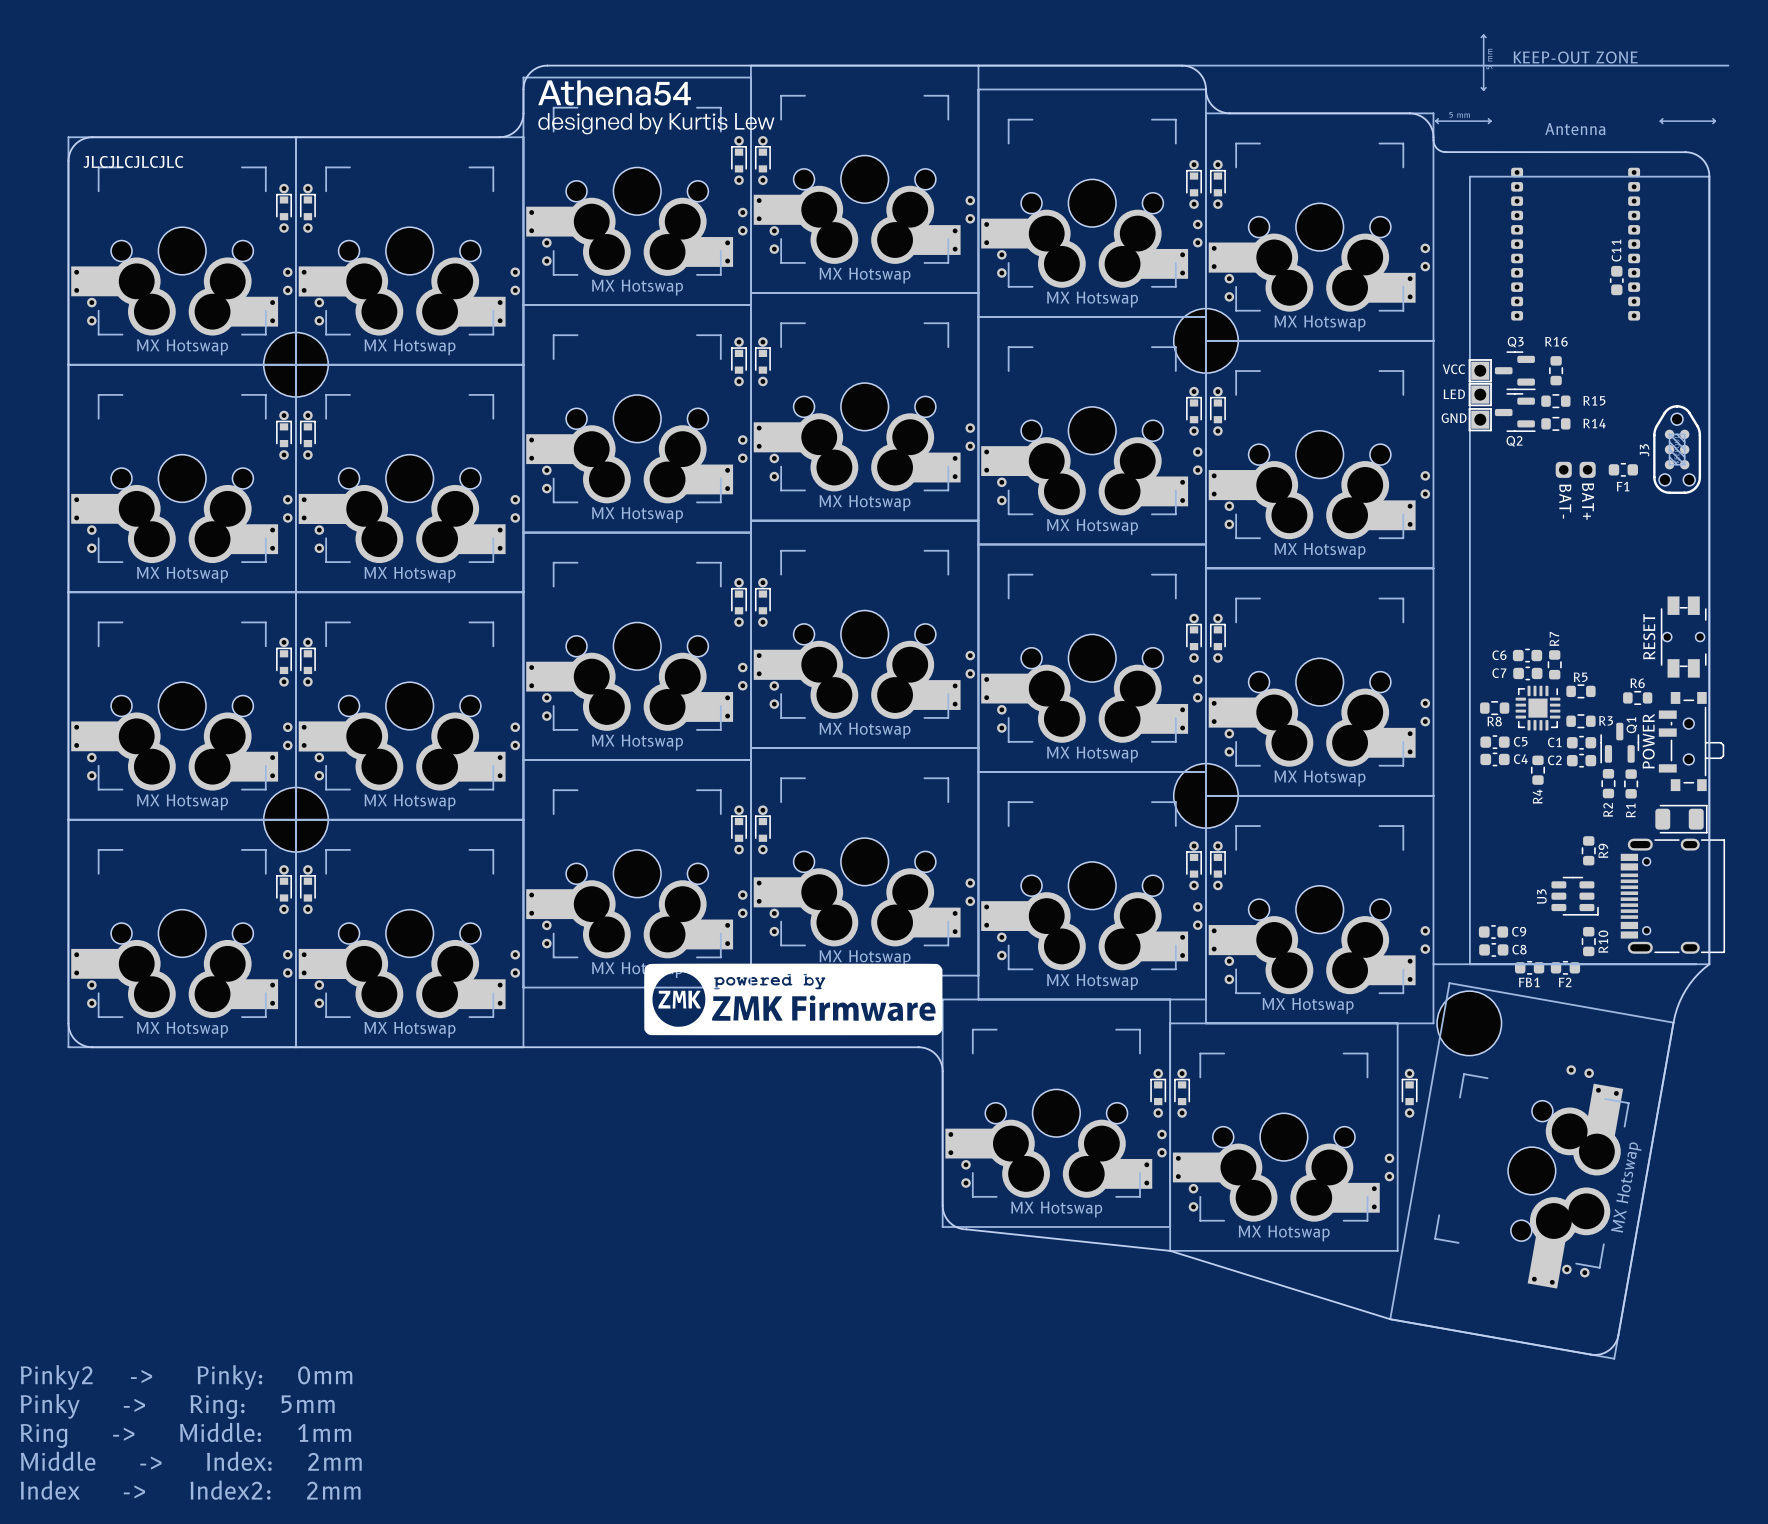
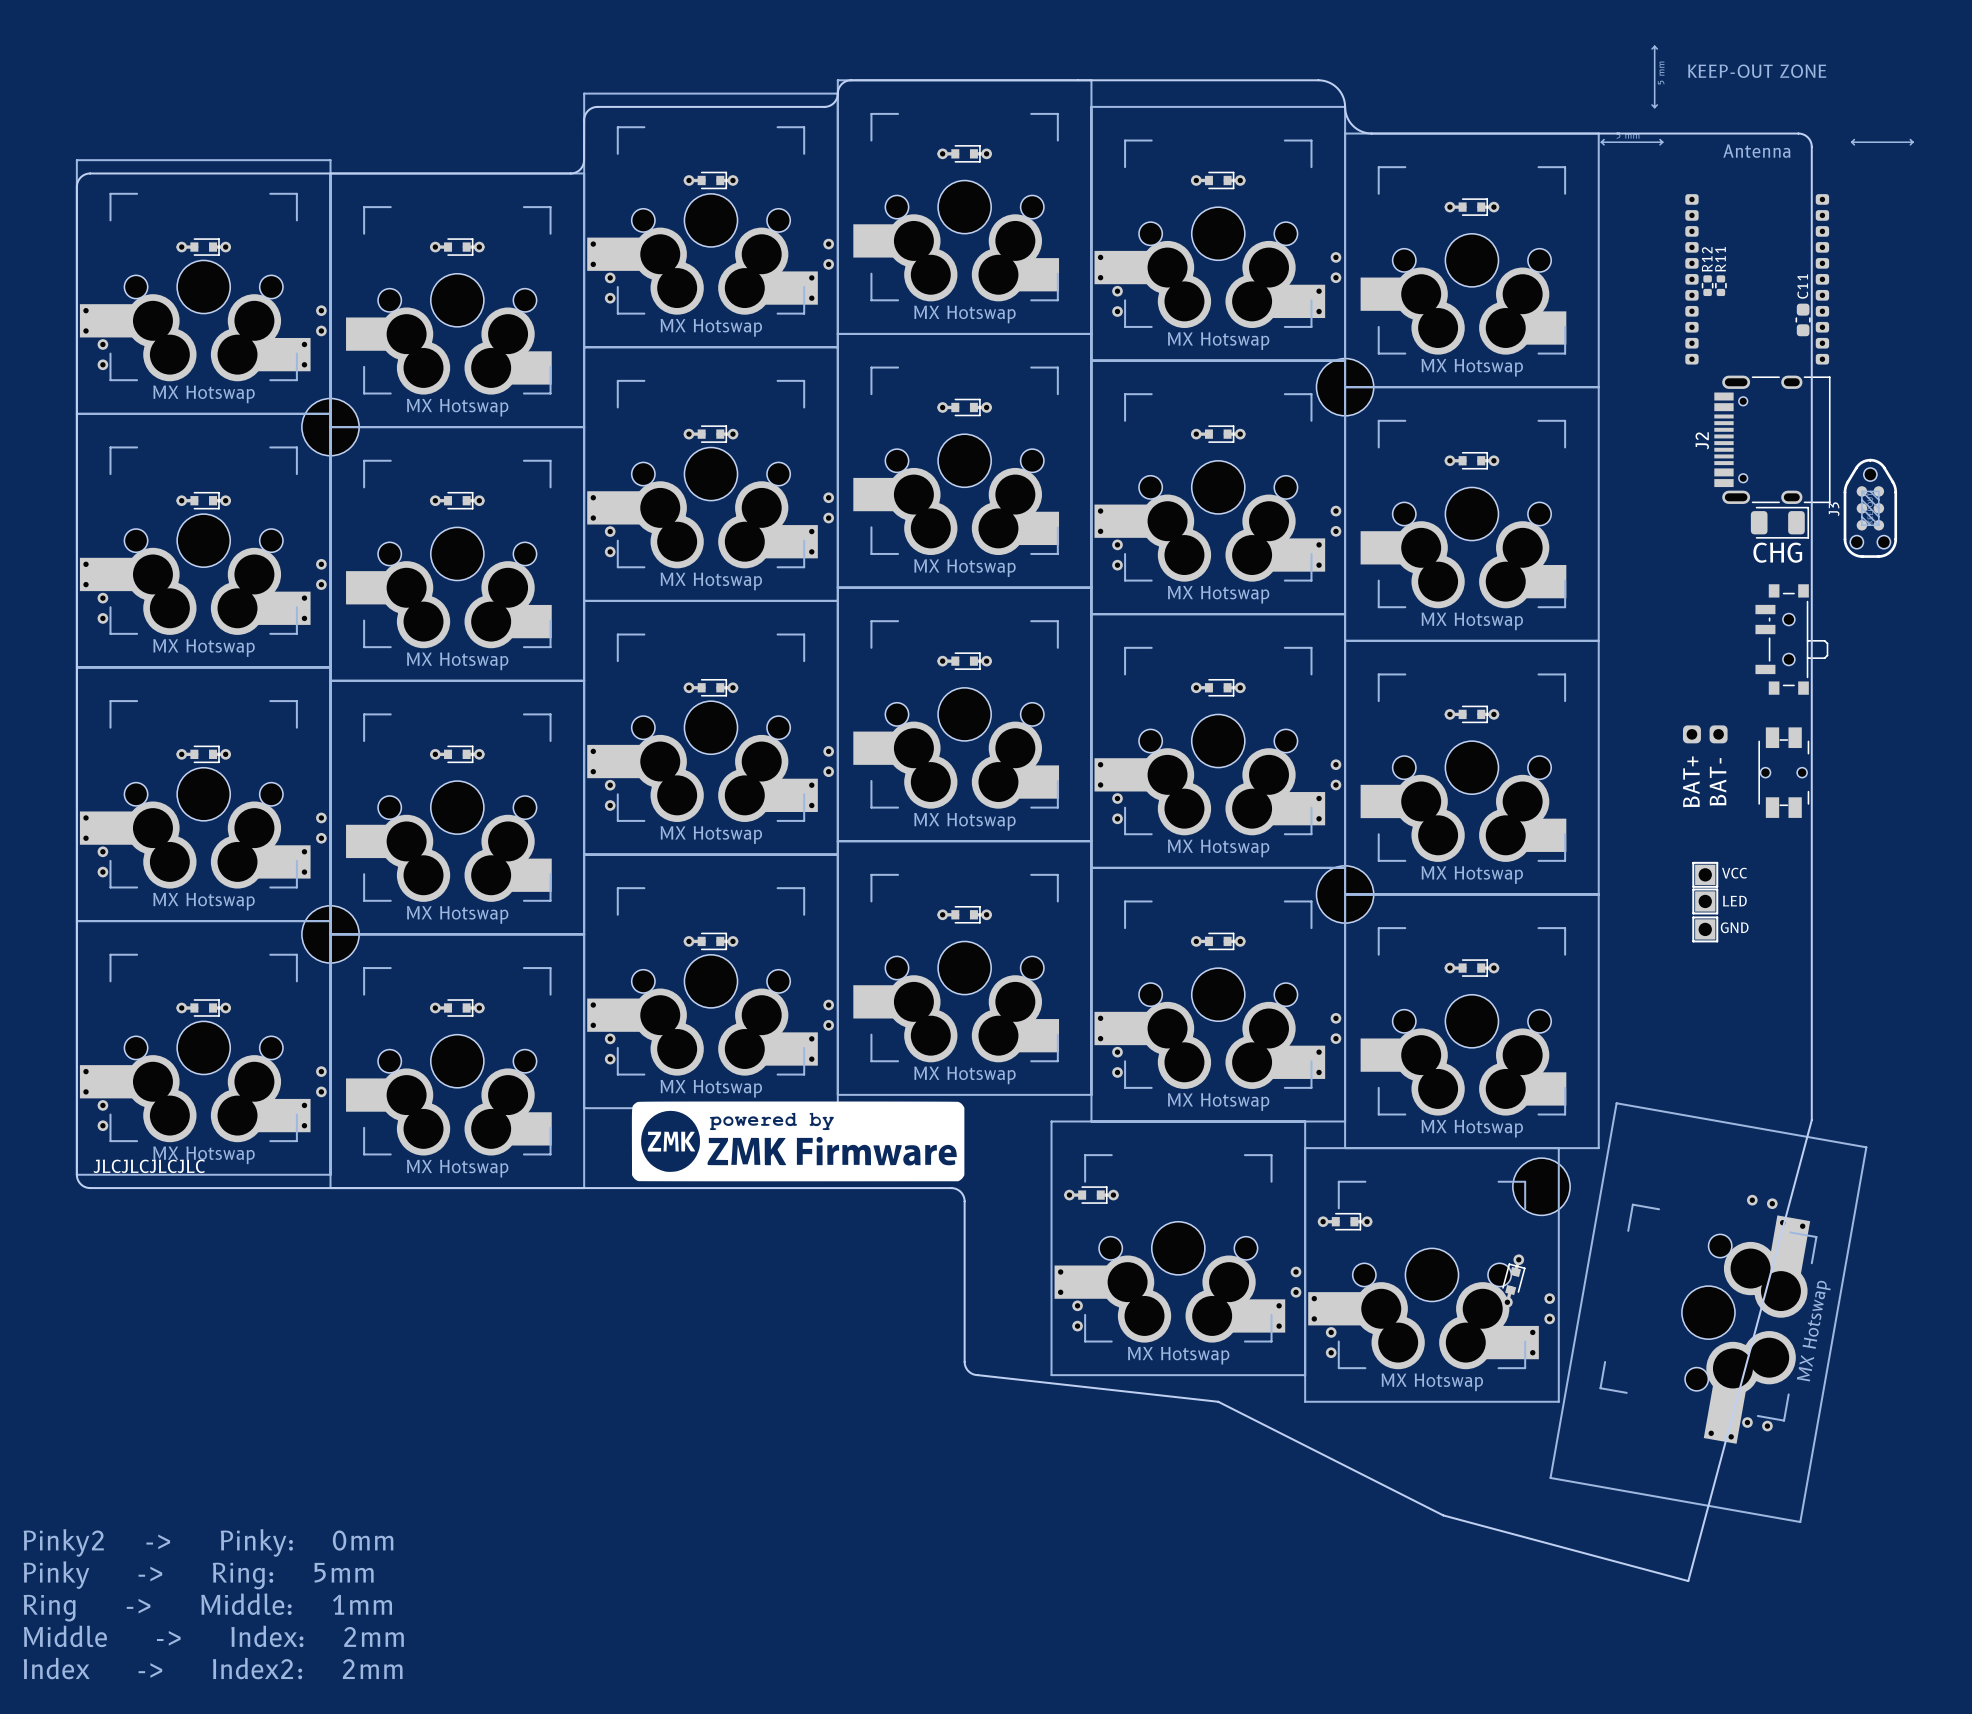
part footprint: [750, 64, 980, 294] -> [836, 79, 1093, 335]
board edge: (762, 65) (542, 66) (532, 70) (524, 81) (523, 116) (520, 125) (514, 132) (502, 137) (92, 137) (81, 139) (75, 144) (69, 153) (68, 161) -> (851, 80) (841, 84) (835, 100) (825, 106) (593, 107) (588, 110) (584, 117) (583, 164) (579, 170) (572, 173) (90, 173) (80, 177) (76, 186)
line: (978, 65) (1728, 65) -> none
drawing: [538, 80, 775, 135] -> none
part footprint: [1205, 112, 1435, 342] -> [1344, 132, 1600, 389]
board edge: (1409, 113) (1419, 115) (1428, 122) (1432, 131) (1434, 145) (1442, 151) (1688, 152) (1702, 159) (1709, 173) (1709, 964) (1694, 978) (1685, 990) (1674, 1015) (1618, 1335) (1615, 1343) (1608, 1350) (1600, 1354) (1590, 1354) (1390, 1319) (1170, 1250) (956, 1227) (947, 1220) (942, 1208) (942, 1065) (935, 1054) (924, 1047) (92, 1047) (81, 1044) (75, 1040) (69, 1031) (68, 1023) -> (1572, 133) (1798, 133) (1806, 136) (1811, 145) (1811, 1120) (1688, 1581) (1443, 1515) (1218, 1401) (972, 1373) (966, 1368) (964, 1361) (964, 1199) (960, 1191) (954, 1188) (90, 1188) (83, 1186) (77, 1179) (76, 1148)
part: none -> (964, 153)
part footprint: [295, 136, 525, 366] -> [329, 172, 586, 429]
part: none -> (710, 180)
part: none -> (1218, 180)
part: (739, 160) -> none
part: (762, 160) -> none
text: JLCJLCJLCJLC (133, 161) -> none
part: none -> (1471, 207)
part: (1194, 184) -> none
part: (1217, 184) -> none
part: (284, 208) -> none
part: (307, 208) -> none
part: none -> (203, 247)
part: none -> (457, 247)
R12: none -> (1707, 285)
R11: none -> (1720, 285)
part footprint: [750, 292, 980, 522] -> [836, 332, 1093, 589]
part footprint: [1173, 308, 1239, 374] -> [1316, 358, 1374, 416]
part footprint: [263, 332, 329, 398] -> [301, 398, 360, 456]
part footprint: [1205, 339, 1435, 570] -> [1344, 386, 1600, 642]
part: none -> (964, 407)
part: (739, 361) -> none
part: (762, 361) -> none
part footprint: [295, 363, 525, 594] -> [329, 426, 586, 682]
Q3: (1515, 370) -> none
R16: (1556, 370) -> none
part: none -> (710, 434)
part: none -> (1218, 434)
J2: none -> (1772, 439)
part: (1480, 395) -> none
R15: (1555, 401) -> none
part: none -> (1471, 460)
part: (1194, 411) -> none
part: (1217, 411) -> none
Q2: (1515, 412) -> none
R14: (1555, 423) -> none
part: (284, 435) -> none
part: (307, 435) -> none
part: none -> (203, 500)
part: none -> (457, 500)
part: none -> CHG (1779, 522)
part side: top (1575, 469) -> bottom (1705, 734)
F1: (1623, 469) -> none
part footprint: [750, 519, 980, 750] -> [836, 586, 1093, 843]
part footprint: [1205, 567, 1435, 797] -> [1344, 639, 1600, 896]
part: none -> (1791, 639)
part: none -> (964, 661)
part footprint: [295, 591, 525, 821] -> [329, 679, 586, 936]
part: (739, 602) -> none
part: (762, 602) -> none
part: none -> (710, 687)
part: none -> (1218, 687)
part: none -> (1471, 714)
part: RESET (1683, 637) -> none
part: (1194, 638) -> none
part: (1217, 638) -> none
C6: (1527, 655) -> none
part: (284, 662) -> none
part: (307, 662) -> none
R7: (1554, 664) -> none
part: none -> (203, 754)
part: none -> (457, 754)
C7: (1527, 673) -> none
part: none -> (1783, 772)
R5: (1580, 691) -> none
R6: (1637, 697) -> none
R8: (1494, 708) -> none
part: (1537, 708) -> none
R3: (1580, 721) -> none
part: POWER (1691, 741) -> none
C5: (1494, 742) -> none
C1: (1581, 742) -> none
Q1: (1619, 743) -> none
part footprint: [750, 747, 980, 977] -> [836, 840, 1093, 1096]
C4: (1494, 759) -> none
C2: (1581, 760) -> none
part footprint: [1173, 763, 1239, 829] -> [1316, 865, 1374, 924]
R4: (1537, 770) -> none
R2: (1608, 783) -> none
R1: (1631, 783) -> none
part footprint: [263, 787, 329, 853] -> [301, 905, 360, 964]
part footprint: [1205, 794, 1435, 1025] -> [1344, 893, 1600, 1150]
part: none -> (1705, 902)
part: none -> (964, 914)
part footprint: [295, 818, 525, 1049] -> [329, 933, 586, 1190]
part: (1681, 819) -> none
part: (739, 829) -> none
part: (762, 829) -> none
part: none -> (710, 941)
part: none -> (1218, 941)
R9: (1588, 850) -> none
part: none -> (1471, 968)
part: (1194, 865) -> none
part: (1217, 865) -> none
part: (284, 889) -> none
part: (307, 889) -> none
U3: (1575, 896) -> none
part: (1672, 896) -> none
part: none -> (203, 1007)
part: none -> (457, 1007)
C9: (1493, 932) -> none
R10: (1588, 941) -> none
C8: (1493, 949) -> none
line: (1433, 964) (1709, 964) (1709, 176) (1469, 176) (1469, 964) -> none
FB1: (1529, 967) -> none
F2: (1565, 967) -> none
drawing position: (793, 999) -> (798, 1141)
part: (1469, 1023) -> none
text: none -> JLCJLCJLCJLC (149, 1166)
part: none -> (1541, 1186)
part: none -> (1091, 1195)
part: none -> (1345, 1221)
part: (1158, 1093) -> none
part: (1182, 1093) -> none
part: (1409, 1093) -> none
part: none -> (1513, 1281)

